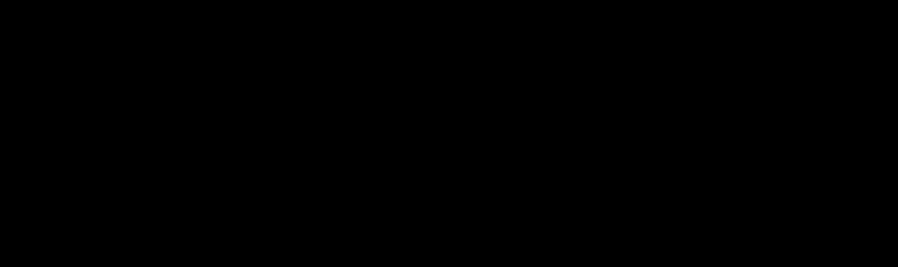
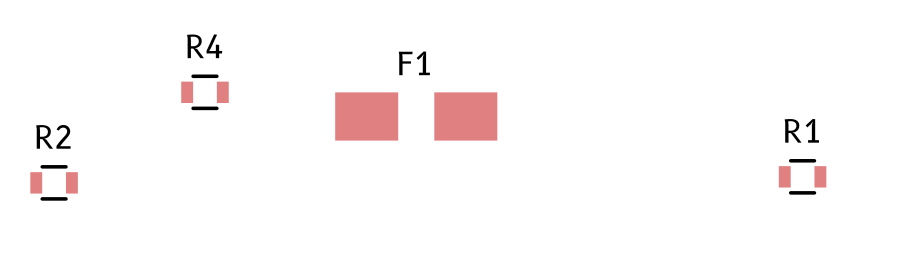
R4: none -> (204, 92)
F1: none -> (416, 116)
R1: none -> (802, 176)
R2: none -> (54, 182)

